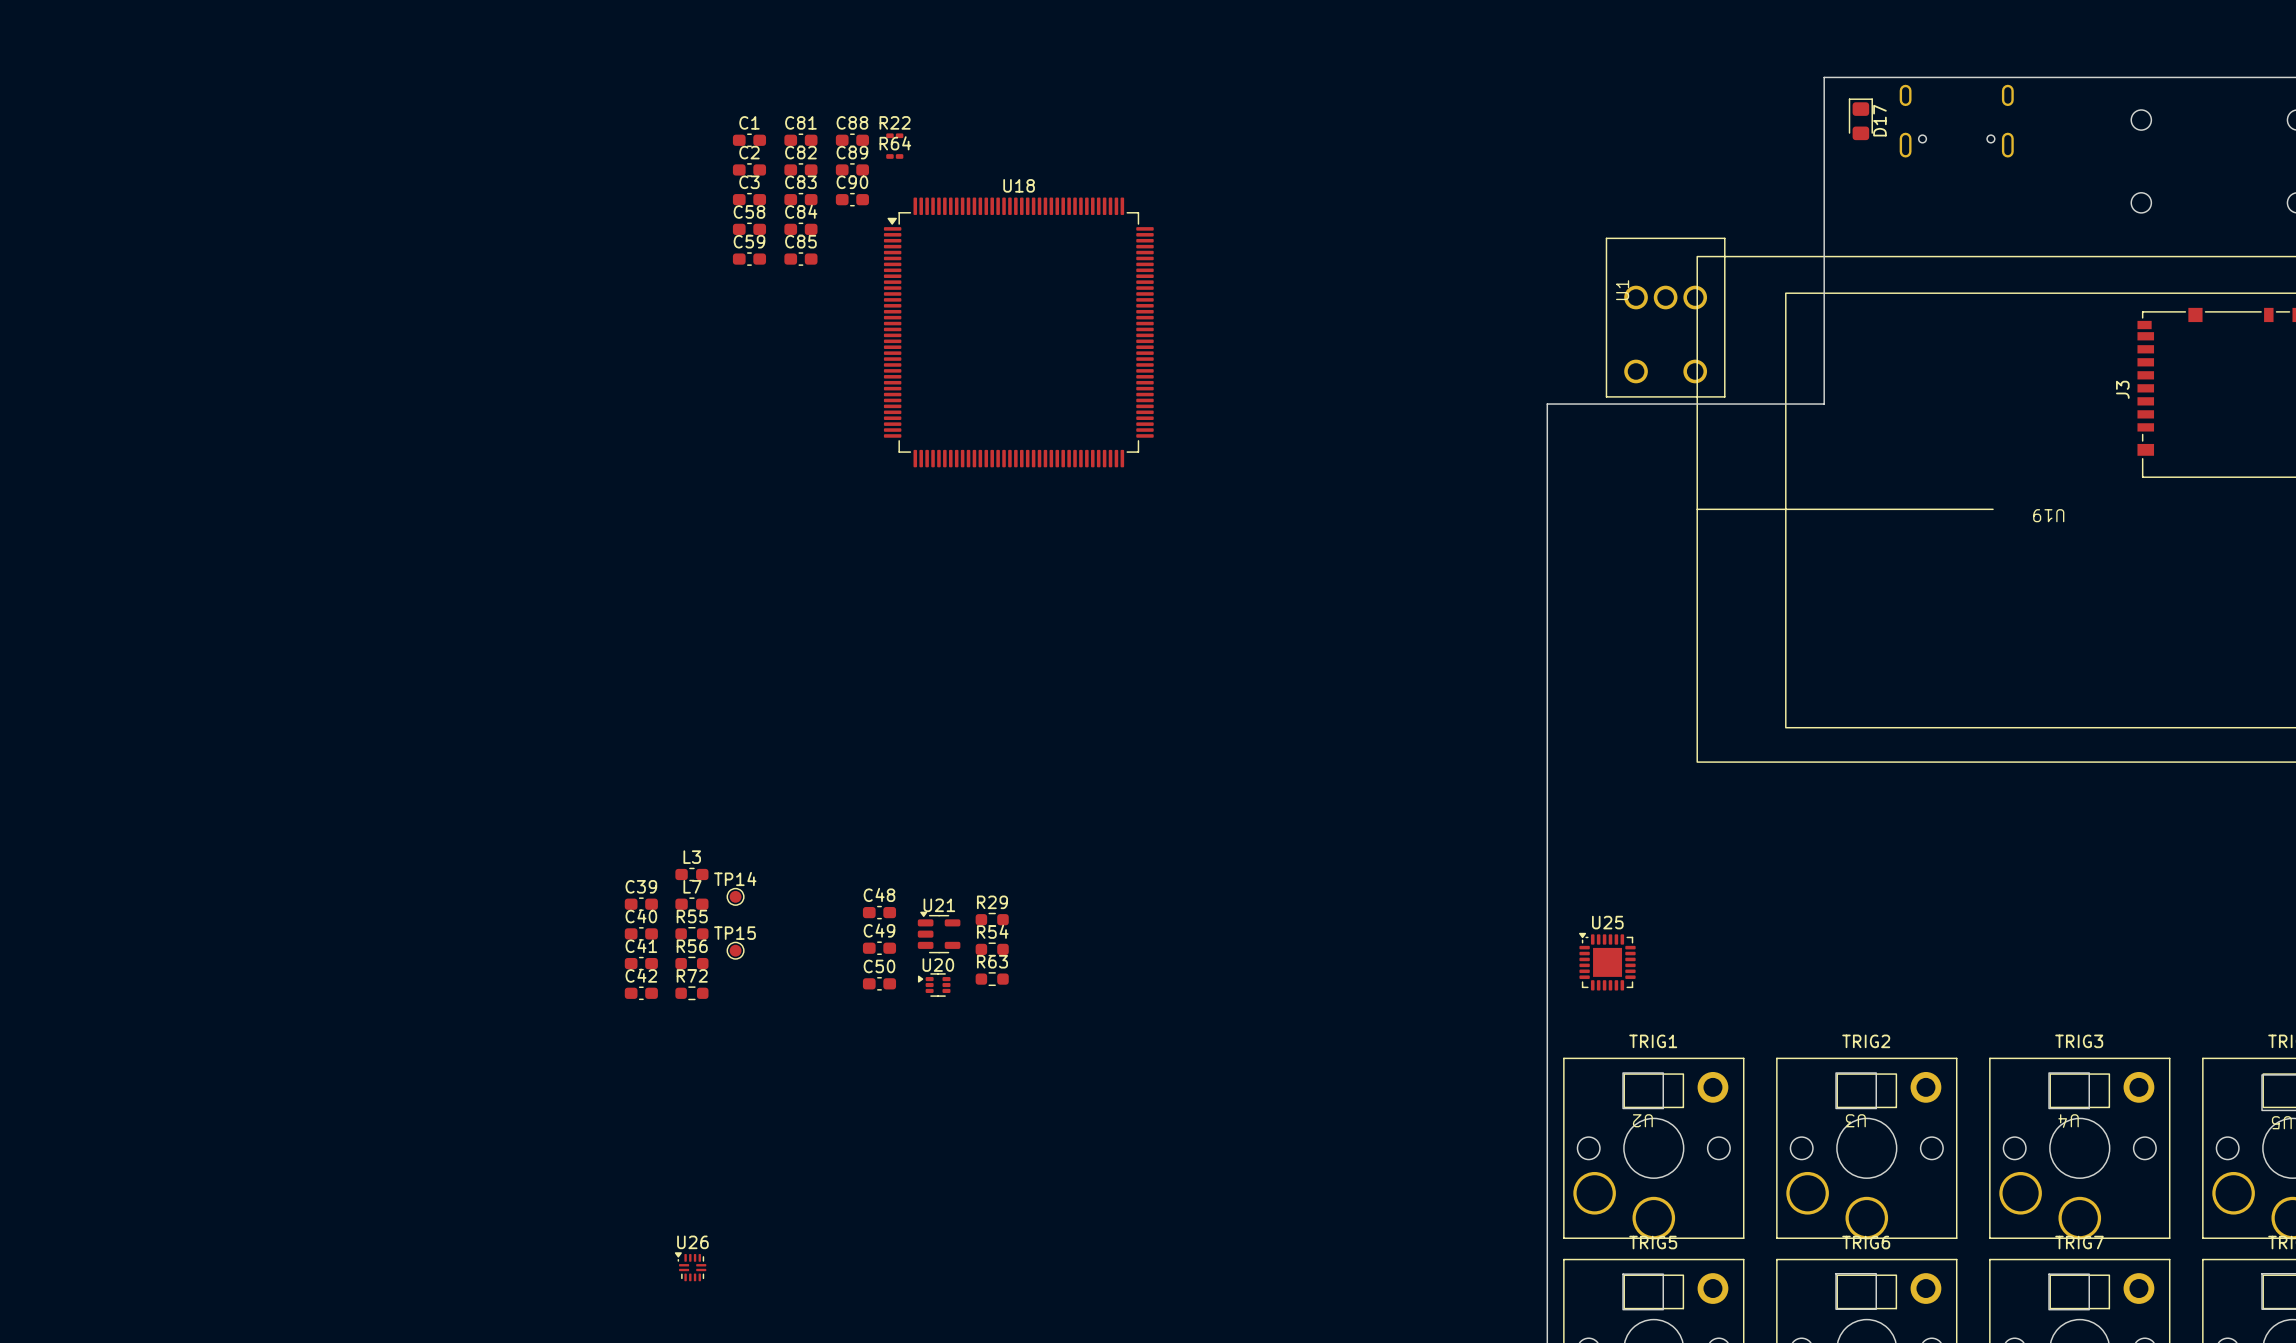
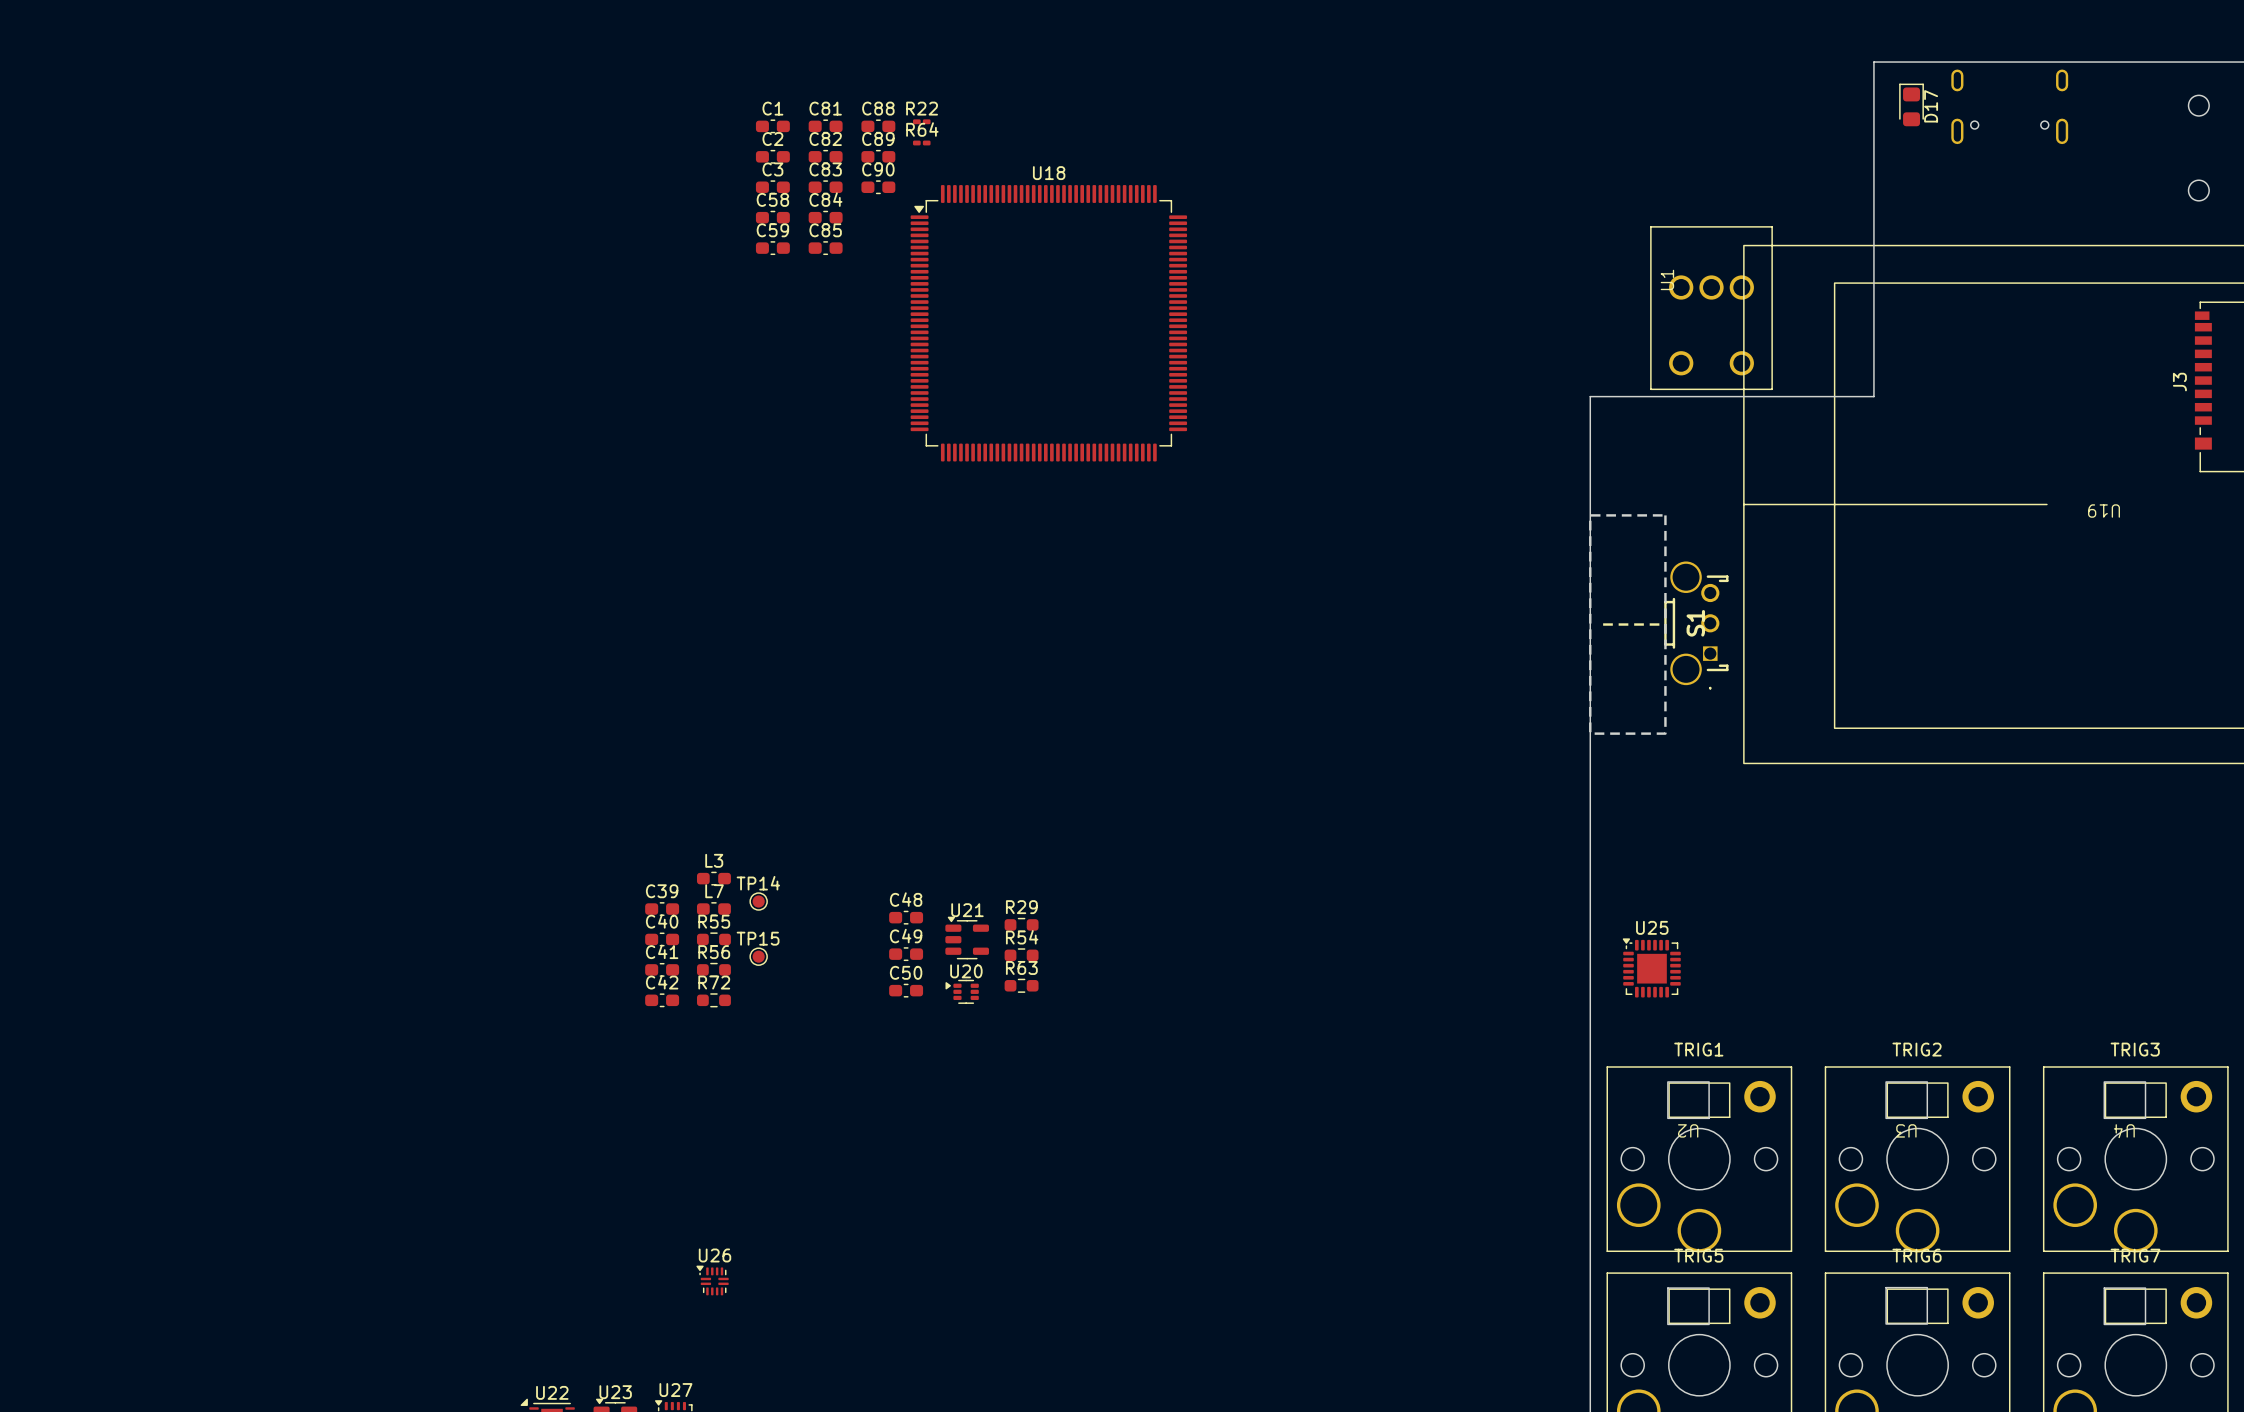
S1: none -> (1658, 624)

